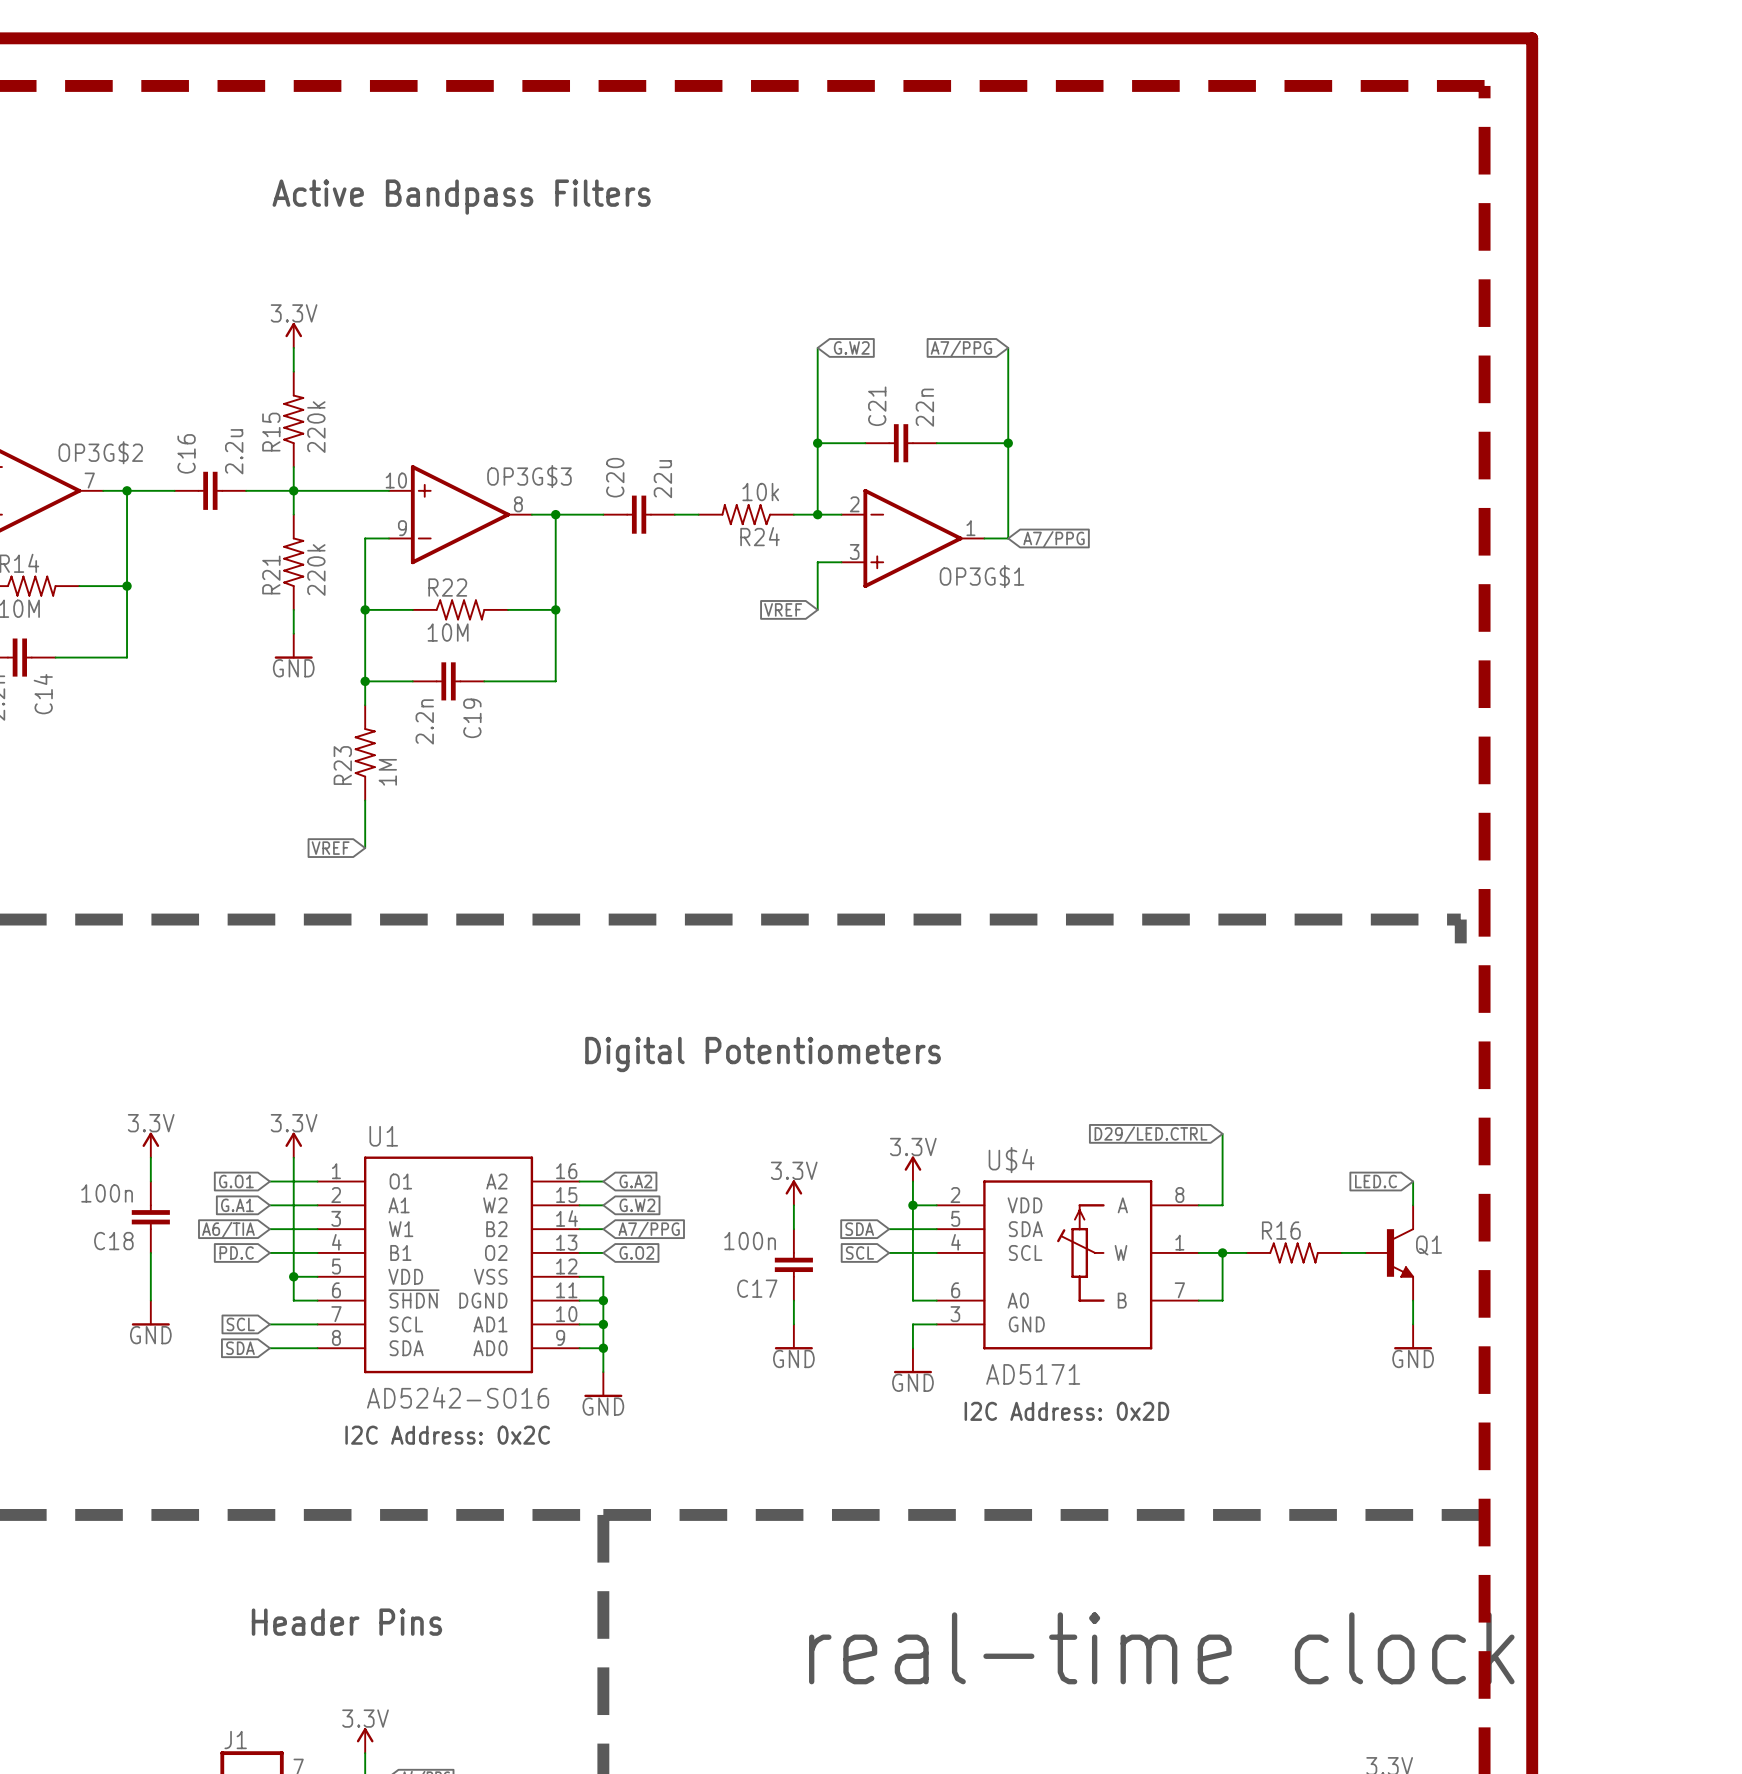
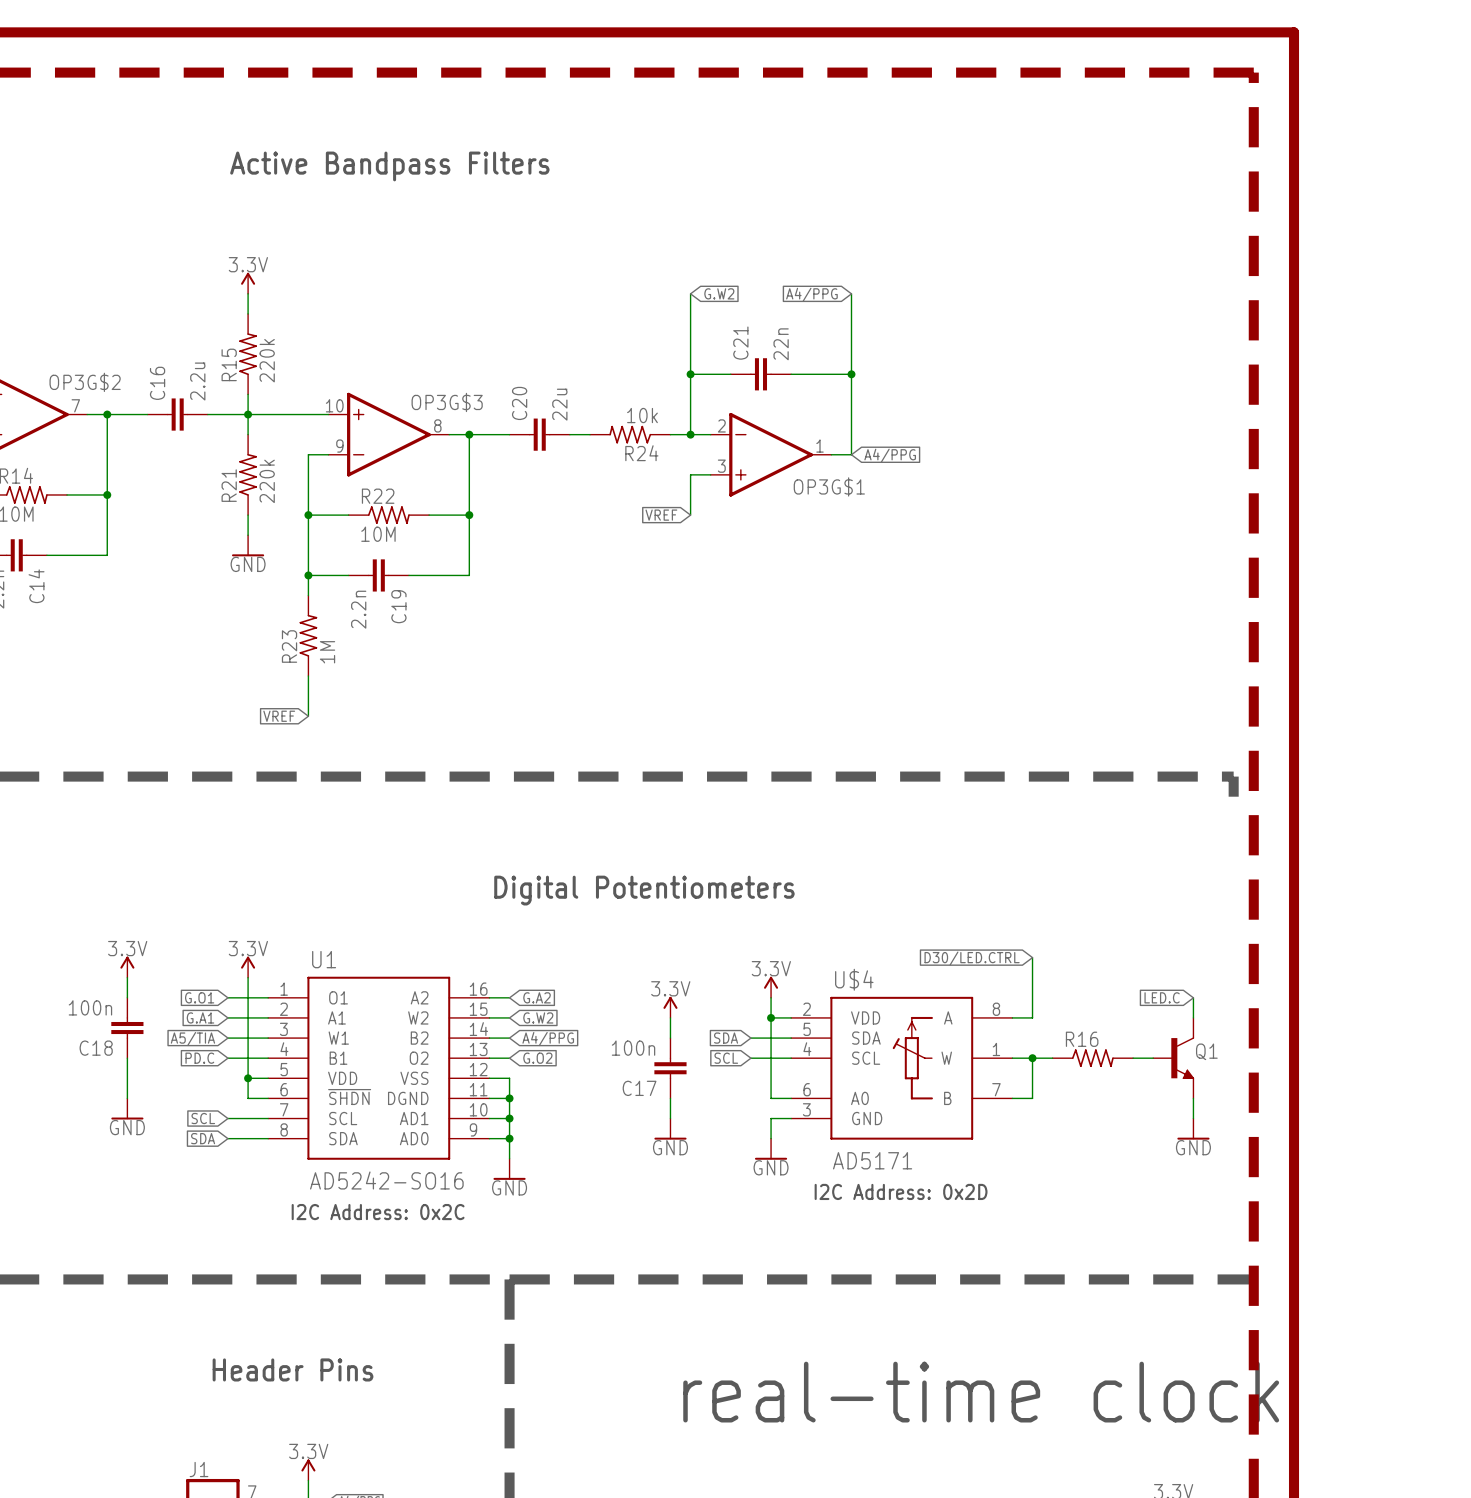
global label: A7/PPG (961, 349) -> A4/PPG (811, 294)
global label: A7/PPG (1054, 539) -> A4/PPG (890, 455)
global label: D29/LED.CTRL (1151, 1135) -> D30/LED.CTRL (972, 958)
global label: A6/TIA (228, 1230) -> A5/TIA (192, 1039)
global label: A7/PPG (649, 1230) -> A4/PPG (548, 1039)

